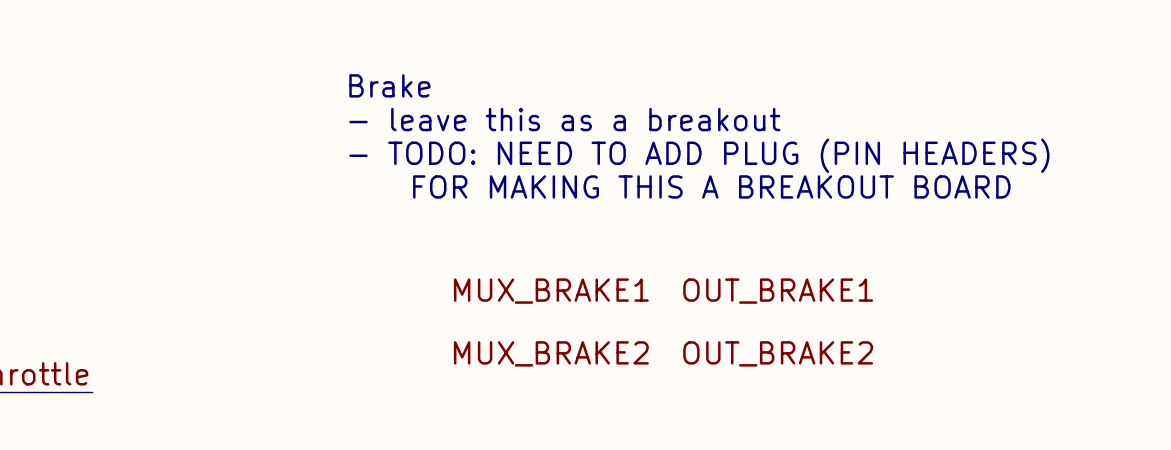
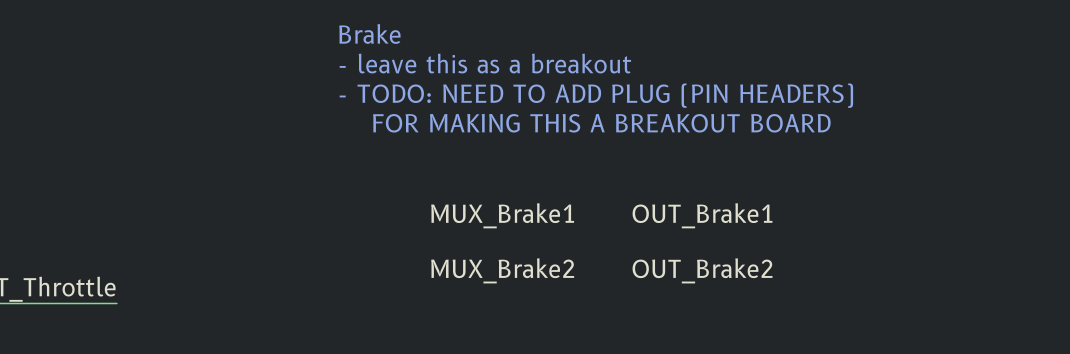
label: MUX_BRAKE1 (551, 291) -> MUX_Brake1 (502, 215)
label: OUT_BRAKE1 (778, 291) -> OUT_Brake1 (702, 215)
label: MUX_BRAKE2 (551, 353) -> MUX_Brake2 (502, 270)
label: OUT_BRAKE2 (778, 353) -> OUT_Brake2 (702, 270)

